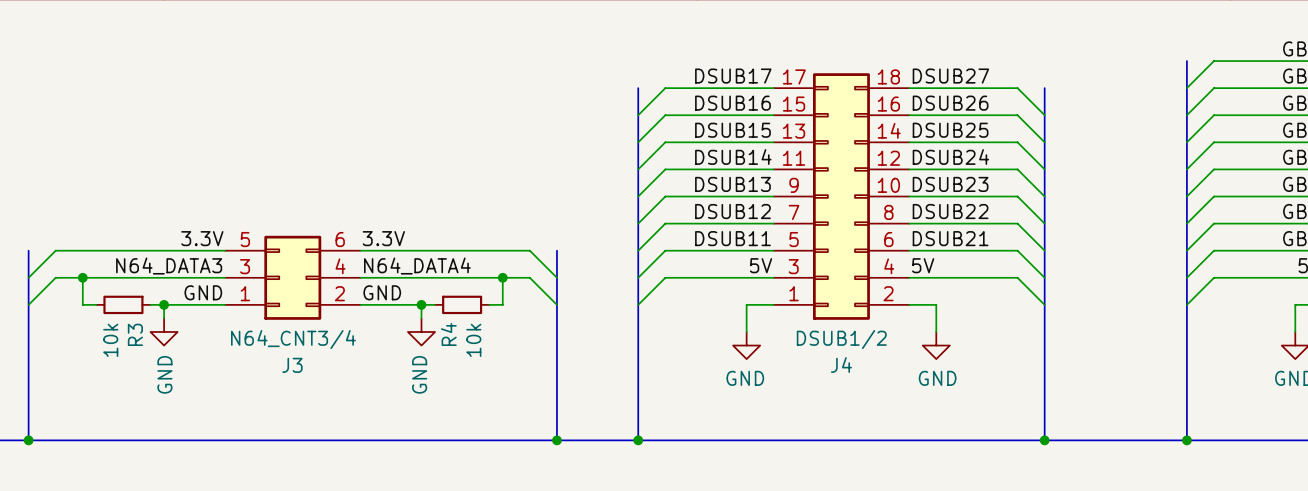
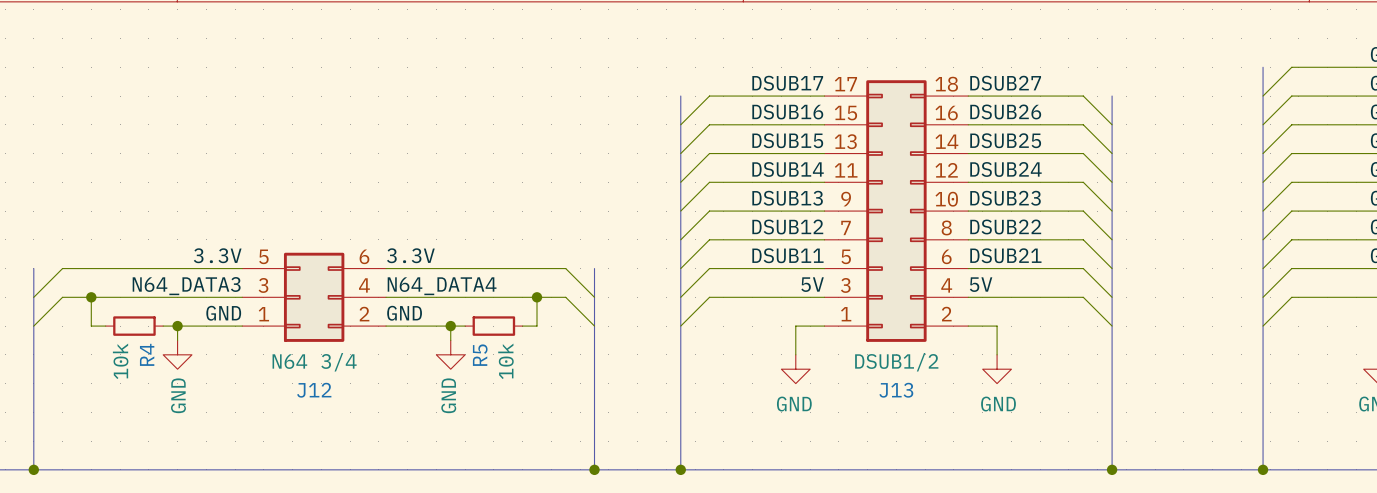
R3 name: R3 (135, 334) -> R4 (147, 354)
R4 name: R4 (448, 334) -> R5 (480, 355)
J3 value: N64_CNT3/4 (293, 339) -> N64 3/4 (314, 362)
J3 name: J3 (292, 365) -> J12 (314, 390)
J4 name: J4 (841, 365) -> J13 (896, 390)

